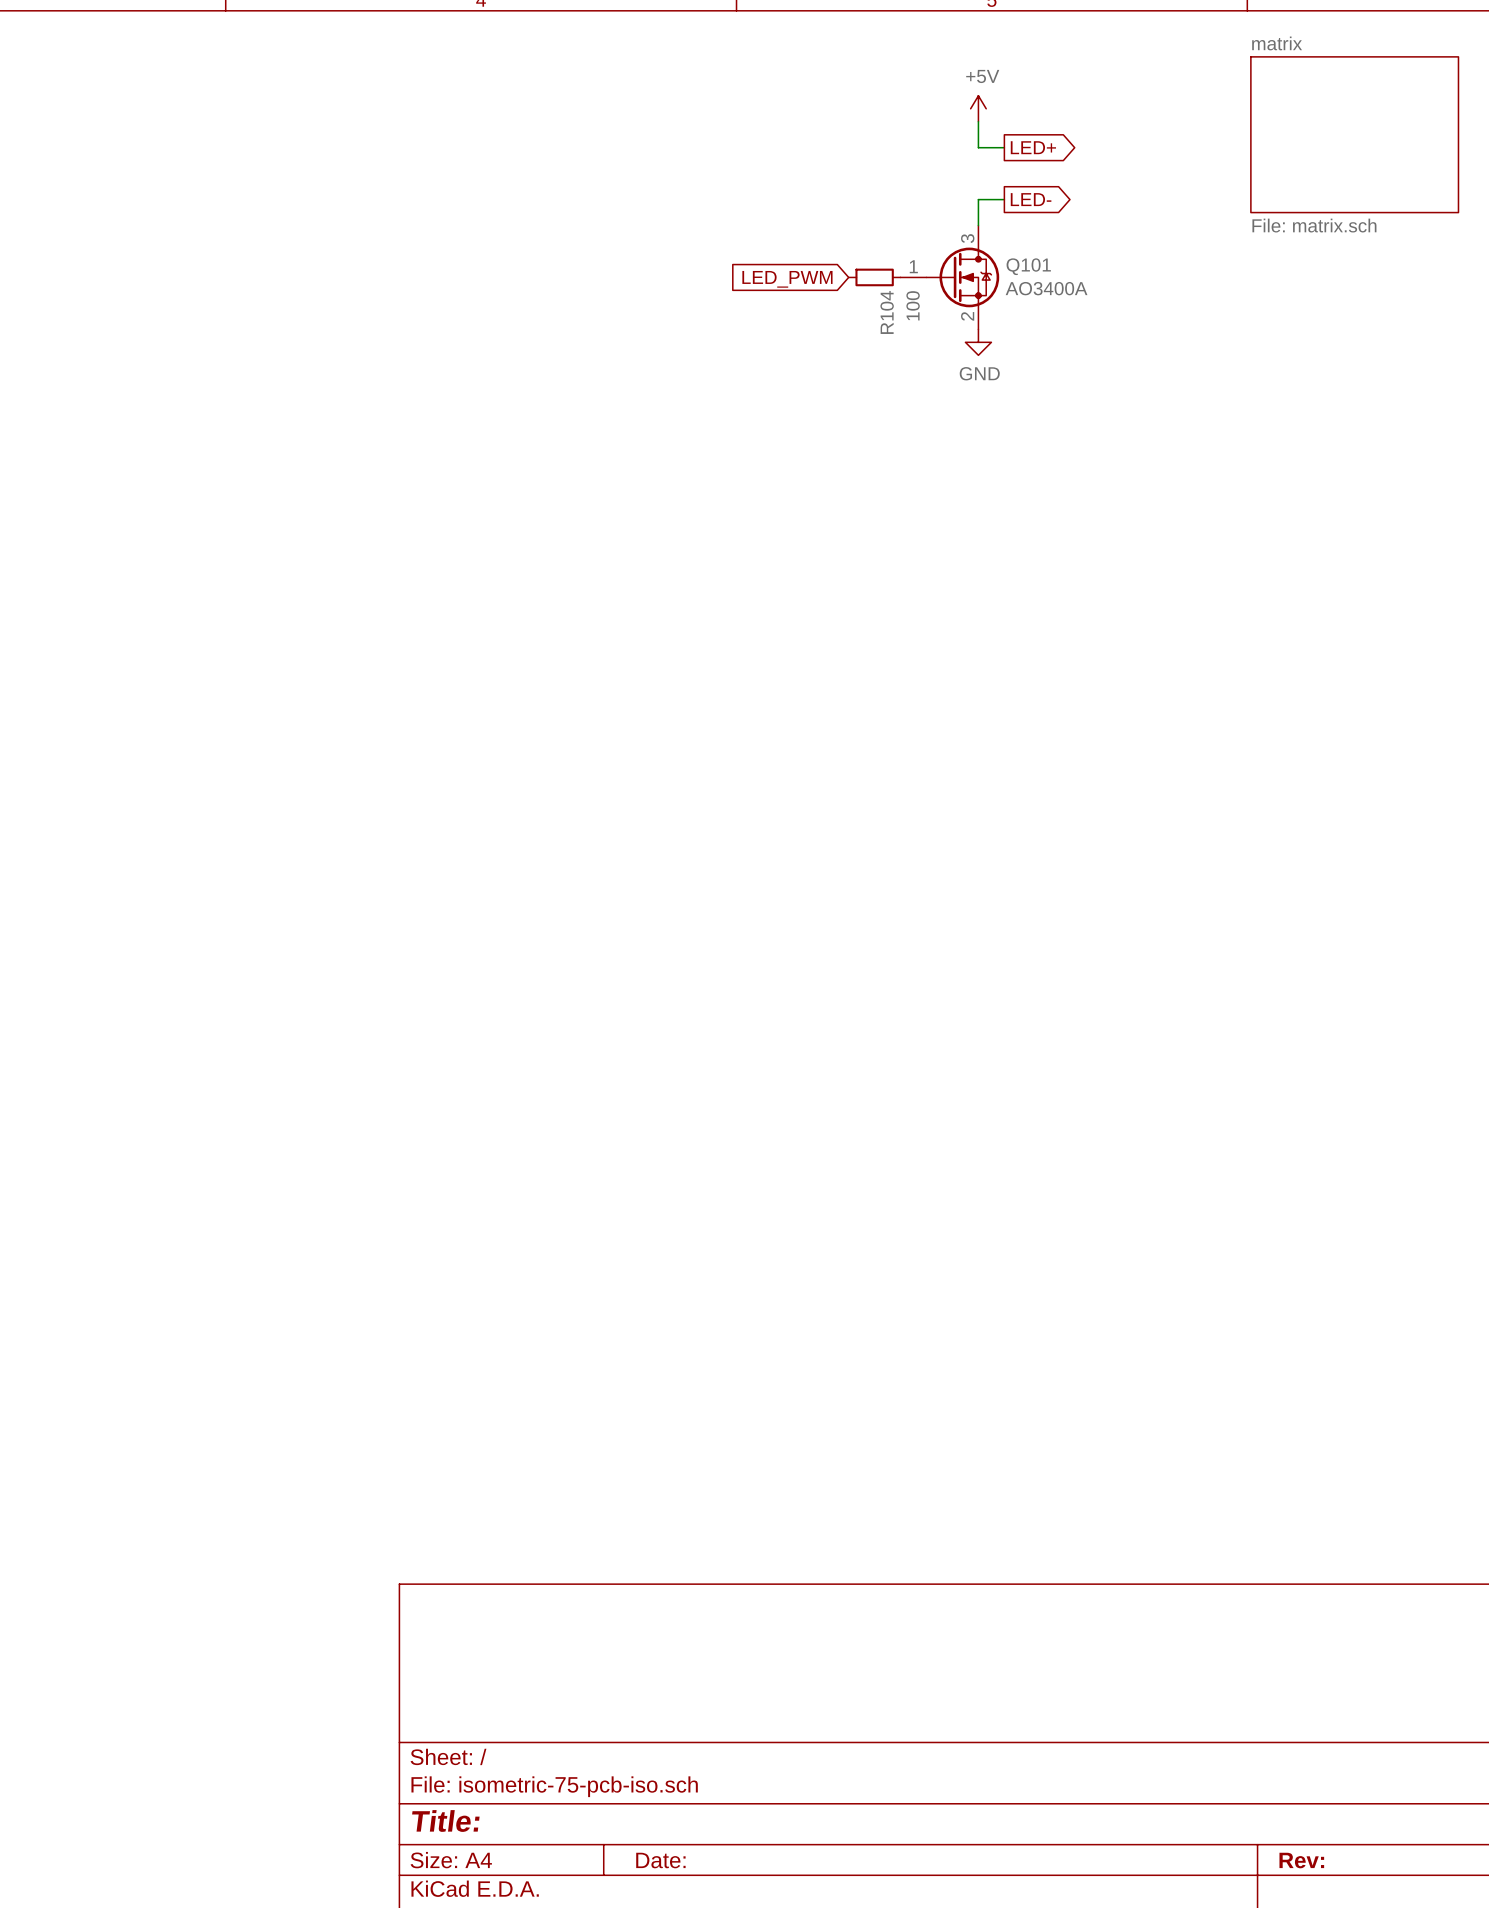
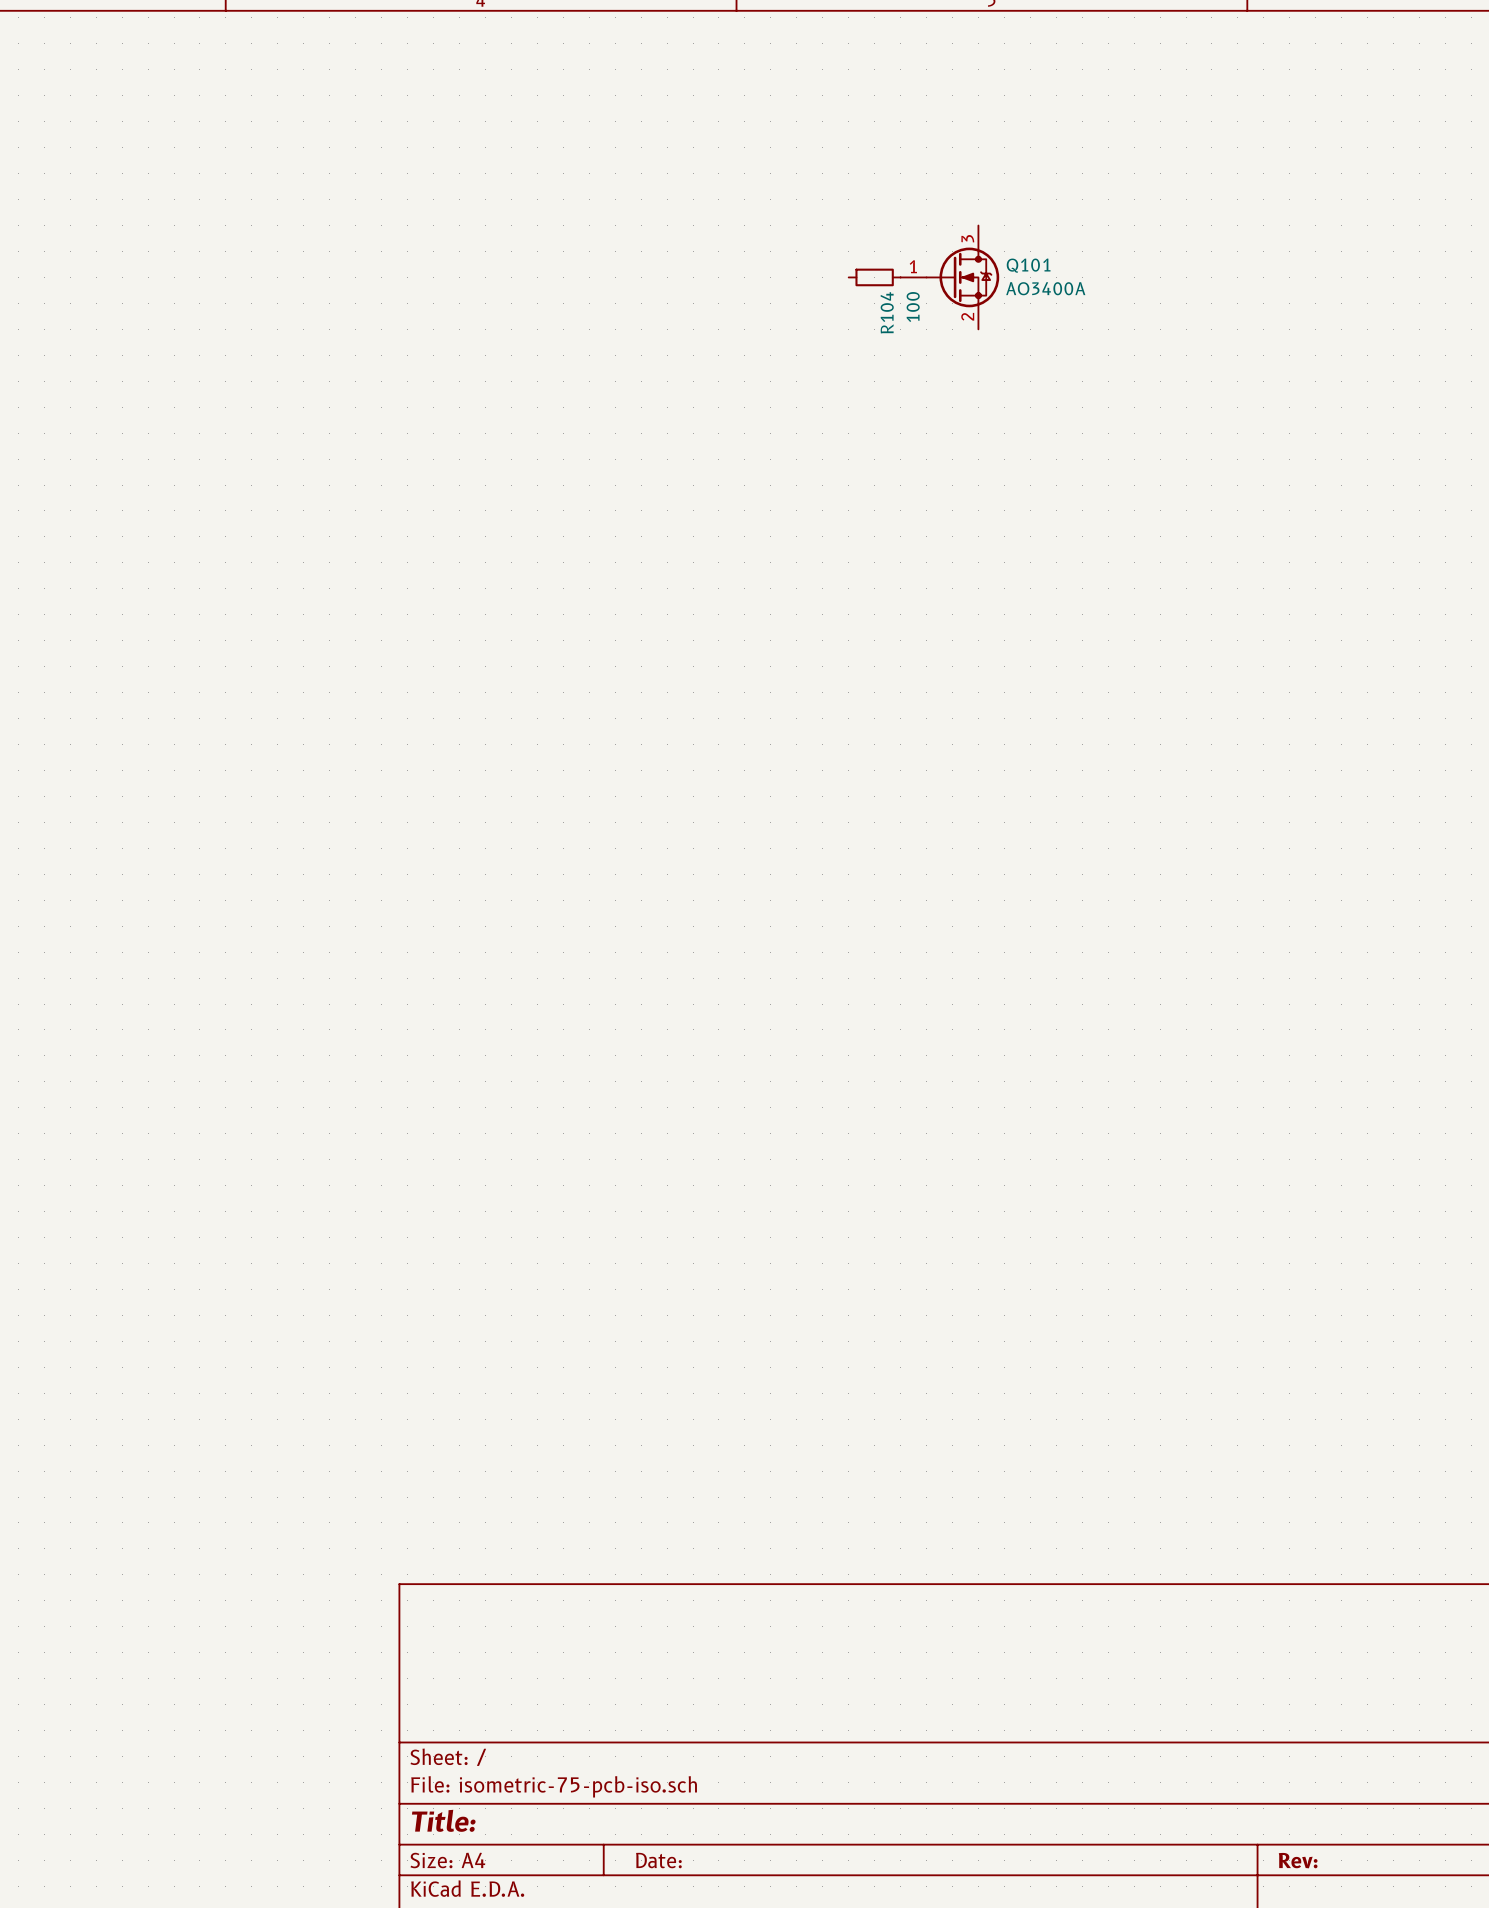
power symbol: +5V (978, 108) -> none
wire: (978, 121) (978, 147) (1004, 147) -> none
sheet matrix: File: matrix.sch (1354, 134) -> none
global label: LED+ (1033, 147) -> none
wire: (1004, 199) (978, 199) (978, 225) -> none
global label: LED- (1031, 199) -> none
global label: LED_PWM (787, 279) -> none
power symbol: GND (978, 342) -> none

